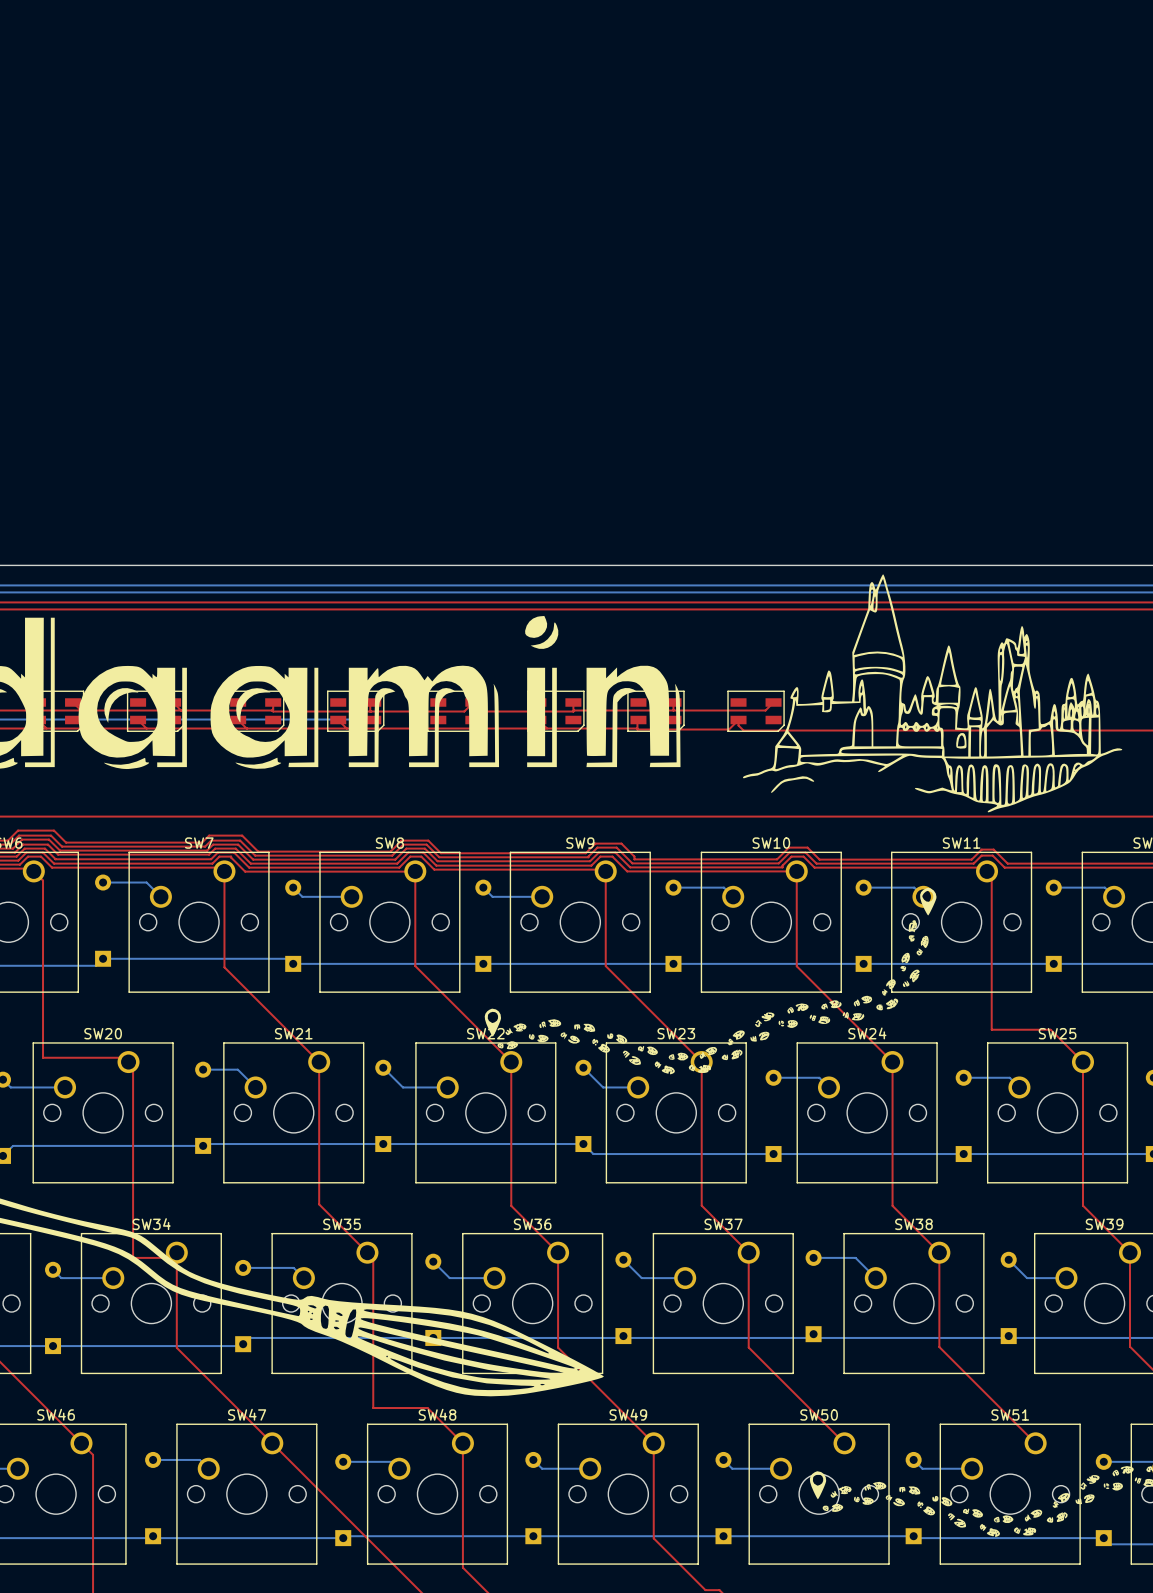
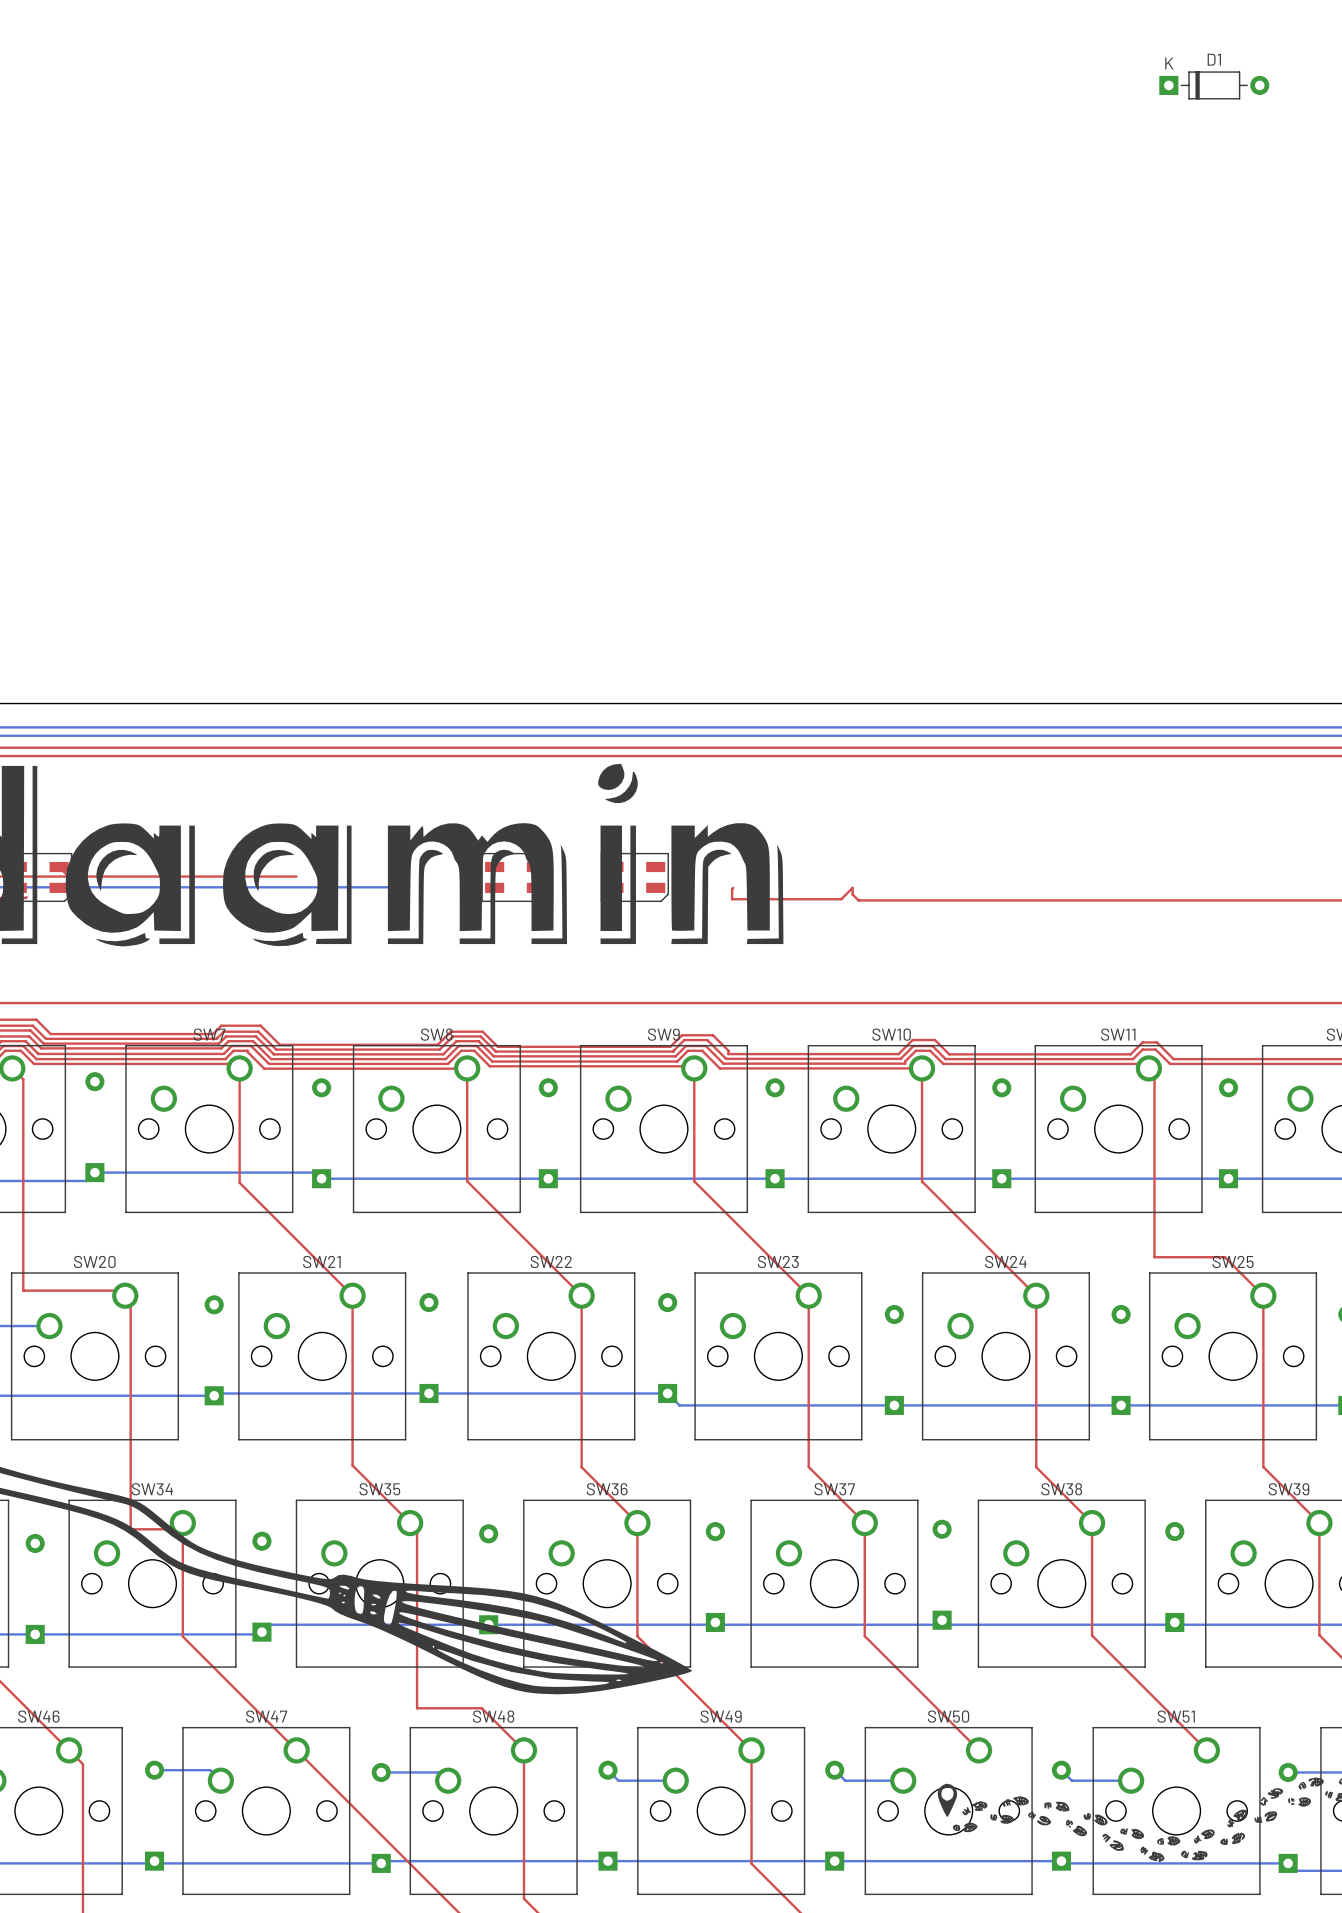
D1: none -> (1214, 85)
drawing: [743, 574, 1123, 813] -> none
top track: (173, 702) (181, 710) -> none
top track: (273, 702) (273, 711) (464, 711) (473, 702) (482, 711) (573, 711) -> none
top track: (373, 702) (370, 705) (370, 711) -> none
top track: (573, 702) (573, 711) -> none
top track: (673, 702) (673, 710) -> none
top track: (773, 702) (765, 710) (573, 711) -> none
part: (155, 711) -> none
part: (255, 711) -> none
part: (355, 711) -> none
part: (655, 711) -> none
part: (756, 711) -> none
top track: (38, 720) (46, 728) (546, 727) -> none
top track: (138, 720) (146, 728) -> none
top track: (238, 720) (246, 728) -> none
top track: (338, 720) (346, 728) -> none
top track: (538, 720) (546, 728) (637, 728) -> none
bottom track: (103, 882) (146, 882) (160, 896) -> none
bottom track: (293, 887) (302, 896) (351, 896) -> none
bottom track: (483, 887) (492, 896) (542, 896) -> none
drawing: [484, 887, 937, 1075] -> none
bottom track: (673, 887) (724, 887) (733, 896) -> none
bottom track: (863, 887) (914, 887) (923, 896) -> none
bottom track: (1053, 887) (1104, 887) (1114, 896) -> none
bottom track: (383, 1067) (402, 1087) (447, 1087) -> none
bottom track: (583, 1067) (603, 1087) (638, 1087) -> none
bottom track: (203, 1069) (237, 1069) (255, 1087) -> none
bottom track: (773, 1077) (819, 1077) (829, 1087) -> none
bottom track: (963, 1077) (1009, 1077) (1019, 1087) -> none
bottom track: (813, 1257) (855, 1257) (875, 1278) -> none
bottom track: (623, 1259) (641, 1278) (685, 1278) -> none
bottom track: (1008, 1259) (1027, 1278) (1066, 1278) -> none
bottom track: (433, 1261) (449, 1278) (494, 1278) -> none
bottom track: (243, 1267) (293, 1267) (303, 1278) -> none
bottom track: (53, 1269) (61, 1278) (113, 1278) -> none

